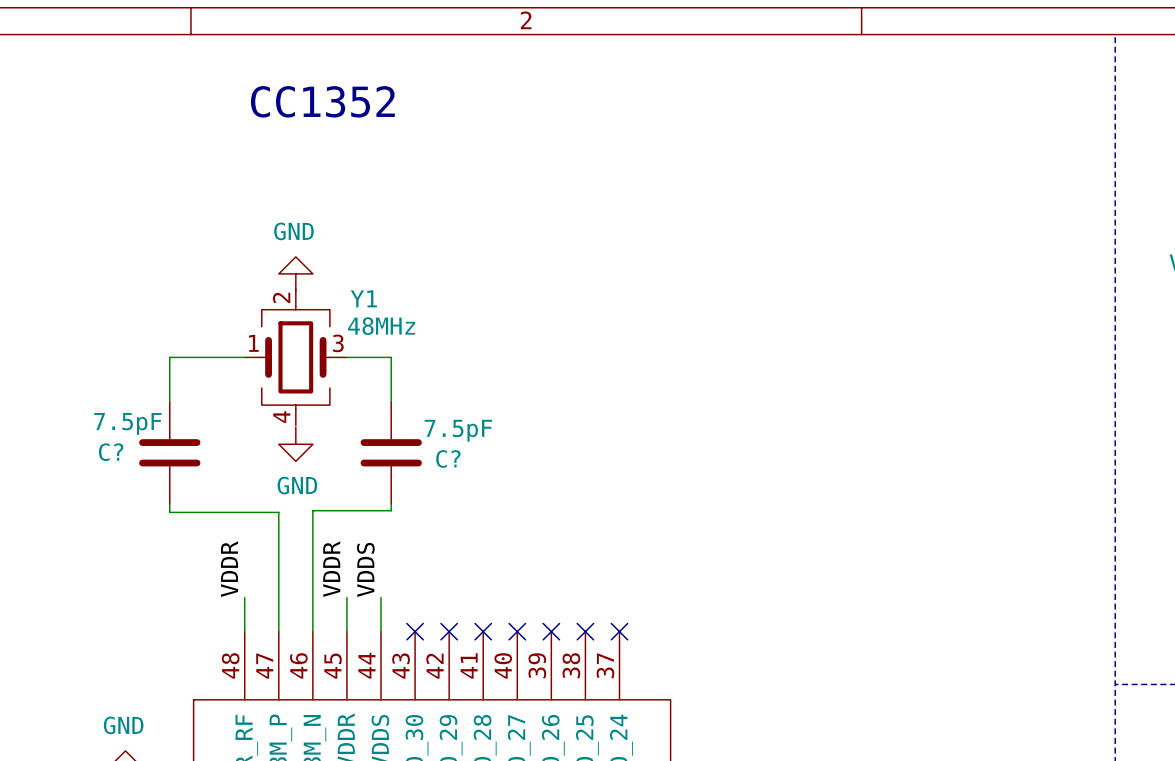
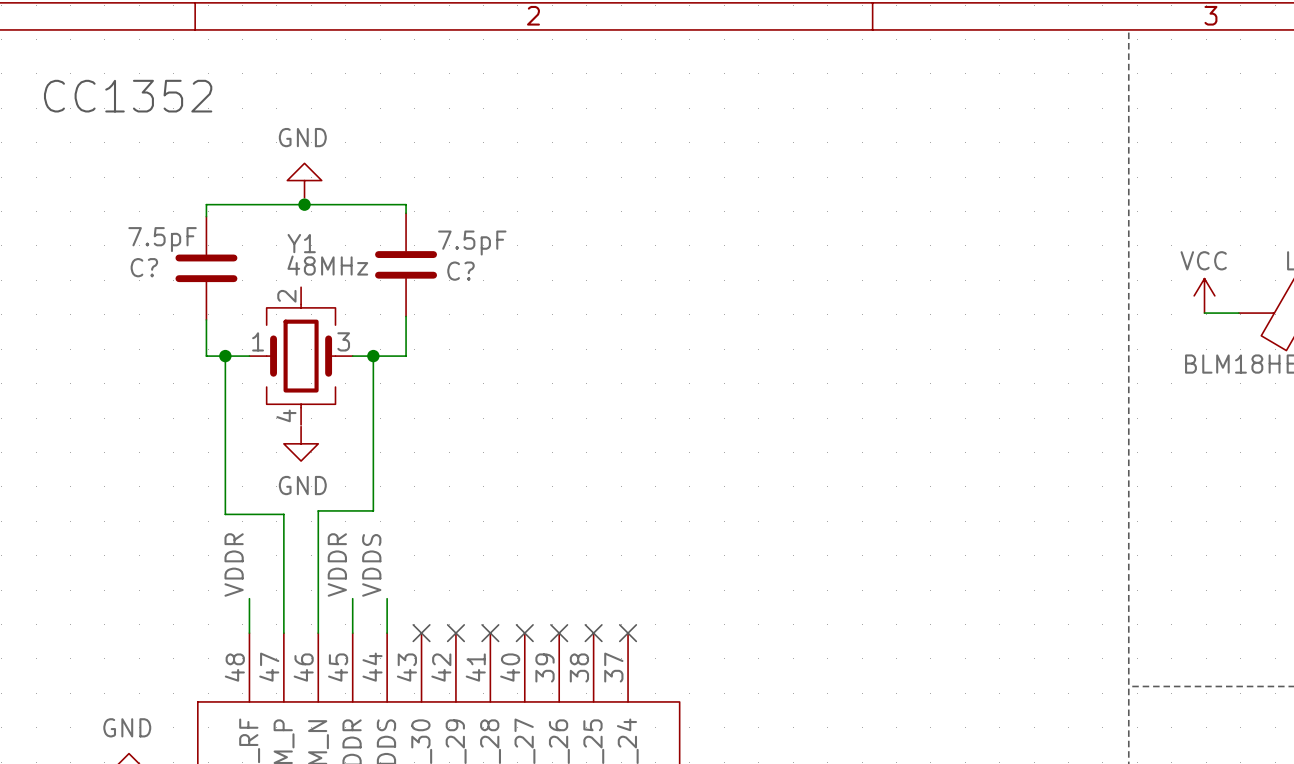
text position: CC1352 (322, 101) -> CC1352 (128, 96)
junction: none -> (304, 204)
wire: none -> (406, 213) (406, 204) (206, 204) (206, 216)
C?: none -> 7.5pF (406, 264)
C?: none -> 7.5pF (206, 268)
power symbol position: GND (295, 273) -> GND (304, 180)
Y1 name position: Y1 (363, 298) -> Y1 (301, 243)
Y1 value position: 48MHz (381, 326) -> 48MHz (327, 265)
wire: (202, 357) (169, 357) (169, 401) -> (206, 356) (206, 319)
junction: none -> (225, 356)
junction: none -> (373, 356)
wire: (391, 357) (391, 401) -> (397, 356) (406, 356) (406, 316)
C?: 7.5pF (169, 452) -> none
C?: 7.5pF (391, 452) -> none
wire: (169, 503) (169, 512) (278, 512) (278, 514) -> (225, 356) (225, 514) (283, 514)
wire: (391, 503) (391, 510) (367, 510) -> (373, 356) (373, 510)

